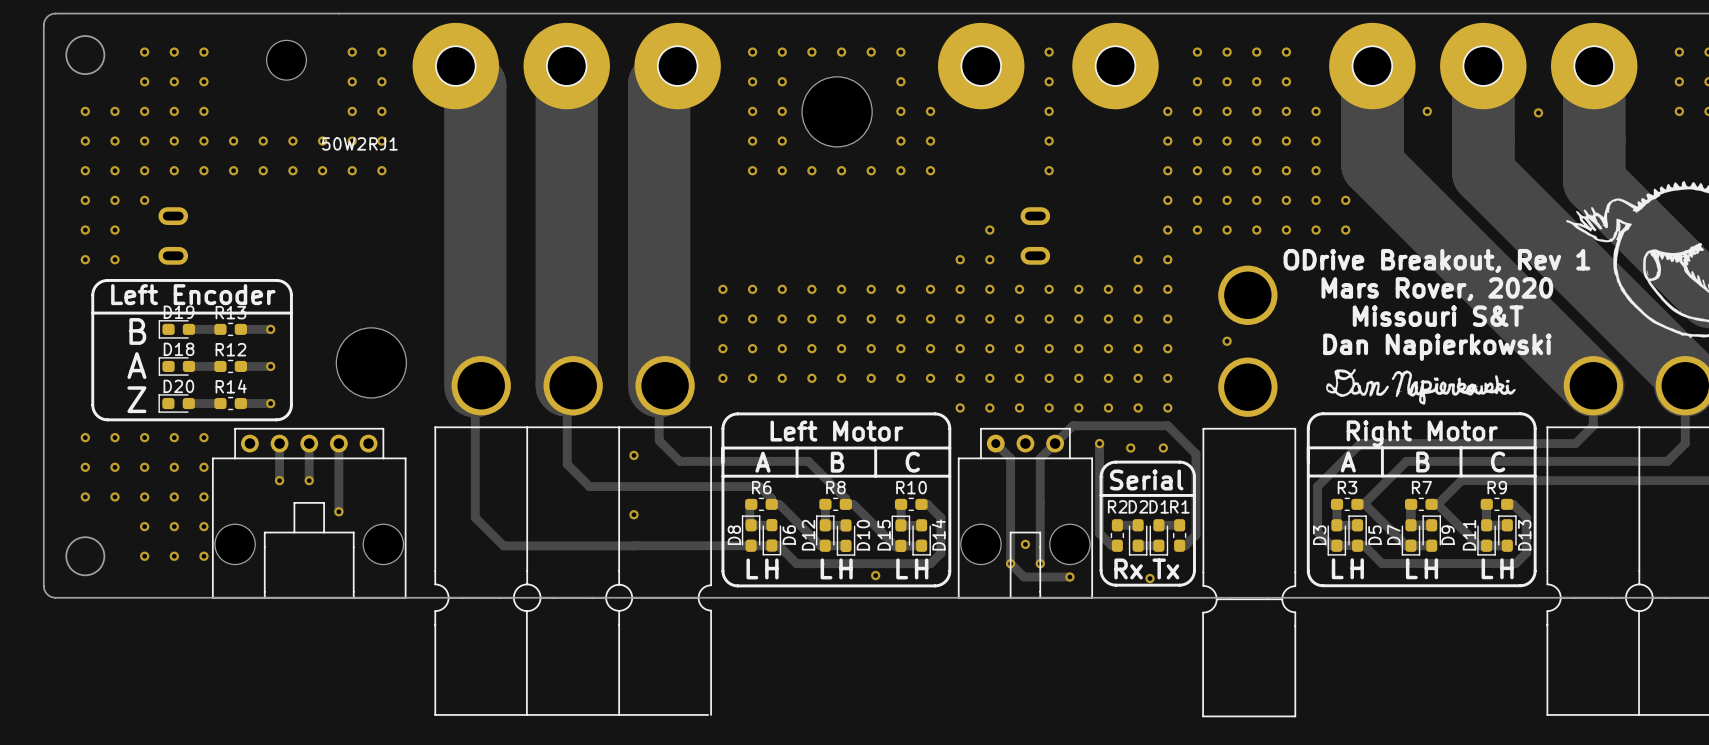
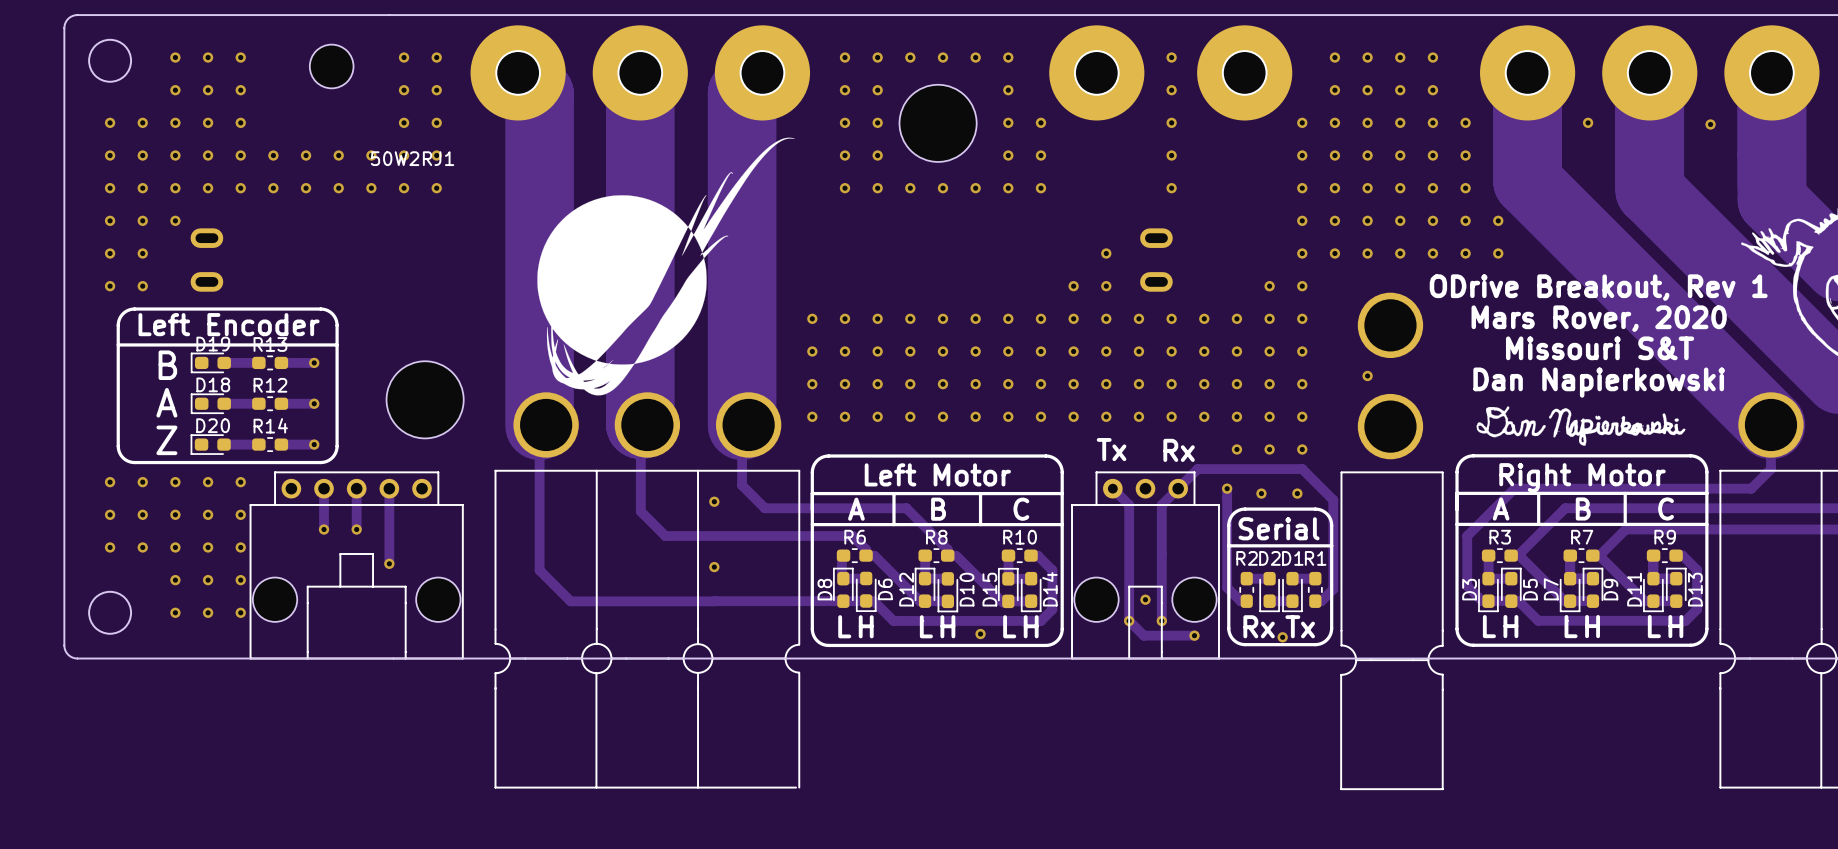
drawing: none -> [537, 137, 796, 396]
via: (960, 407) -> none
via: (989, 407) -> none
via: (1019, 407) -> none
via: (1049, 407) -> none
via: (1078, 407) -> none
text: none -> Tx (1111, 449)
text: none -> Rx (1179, 450)

